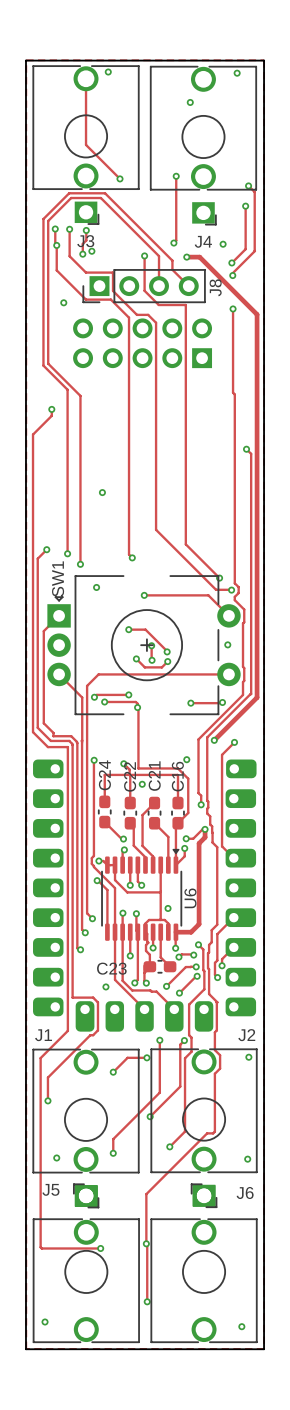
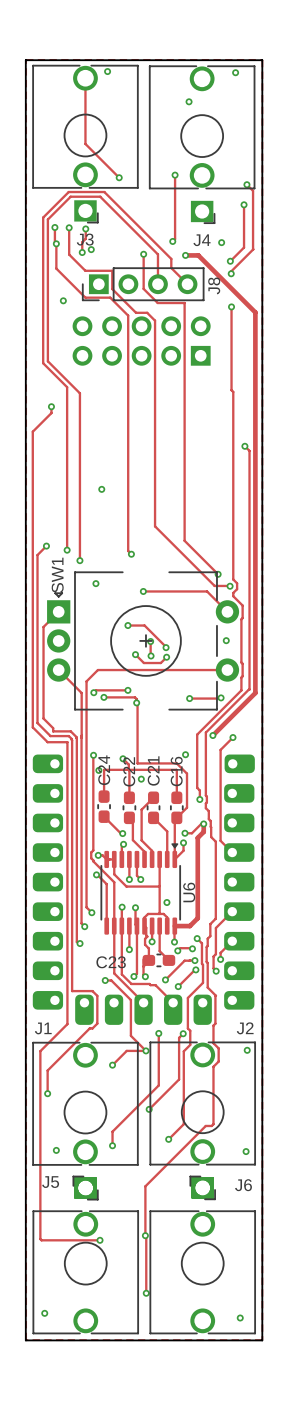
via: none -> (98, 770)
track: none -> (105, 980) (111, 980) (130, 1000) (130, 1035) (145, 1050)

